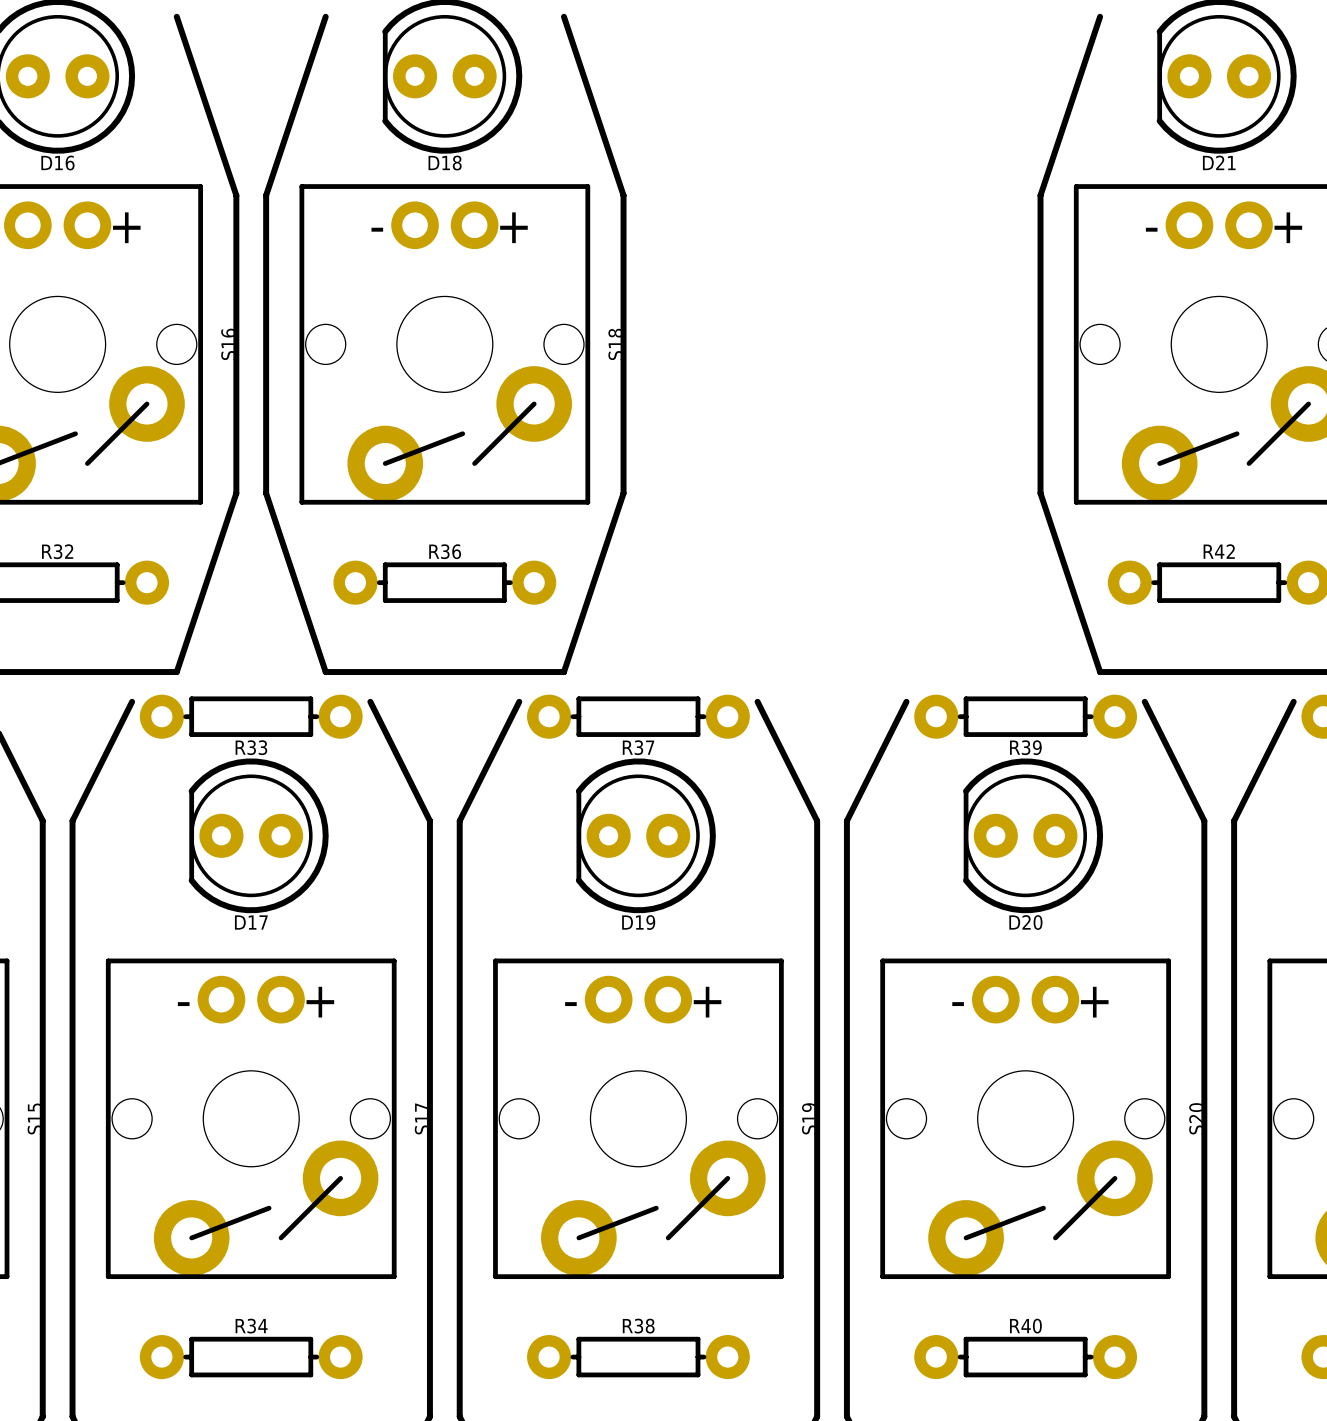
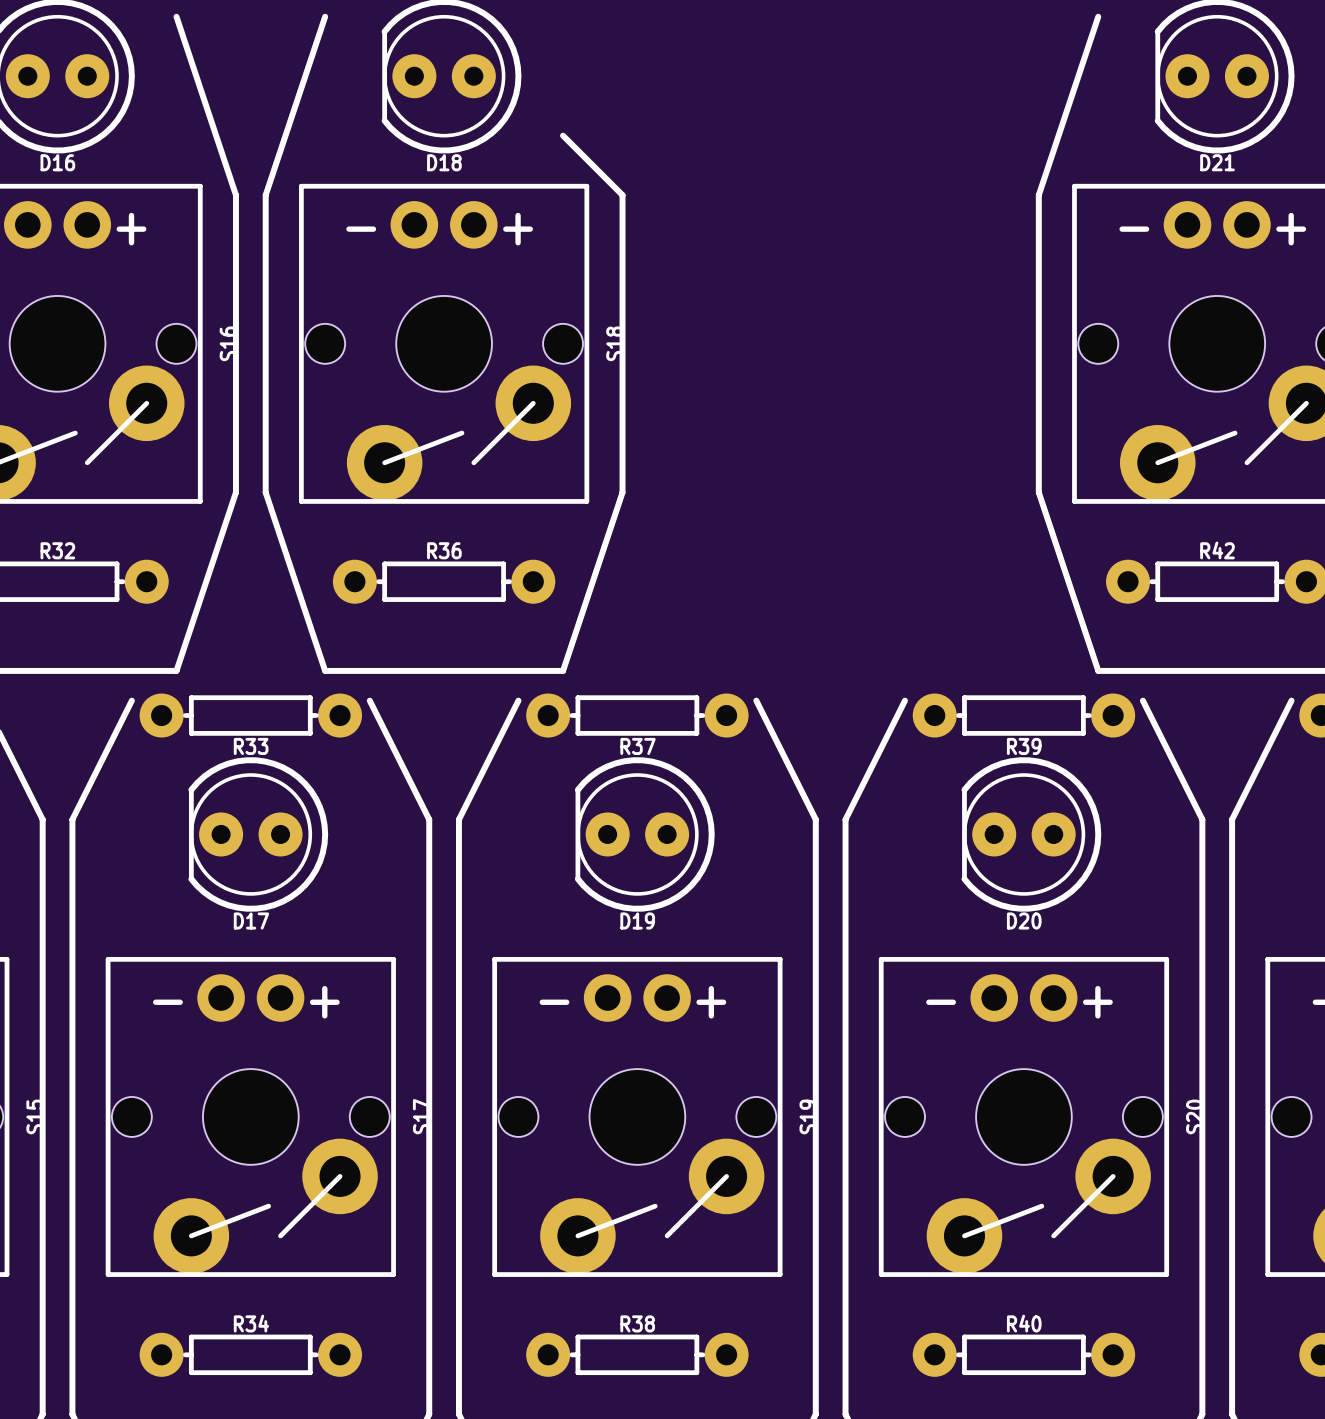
line: (563, 16) (623, 195) -> (563, 135) (622, 195)

